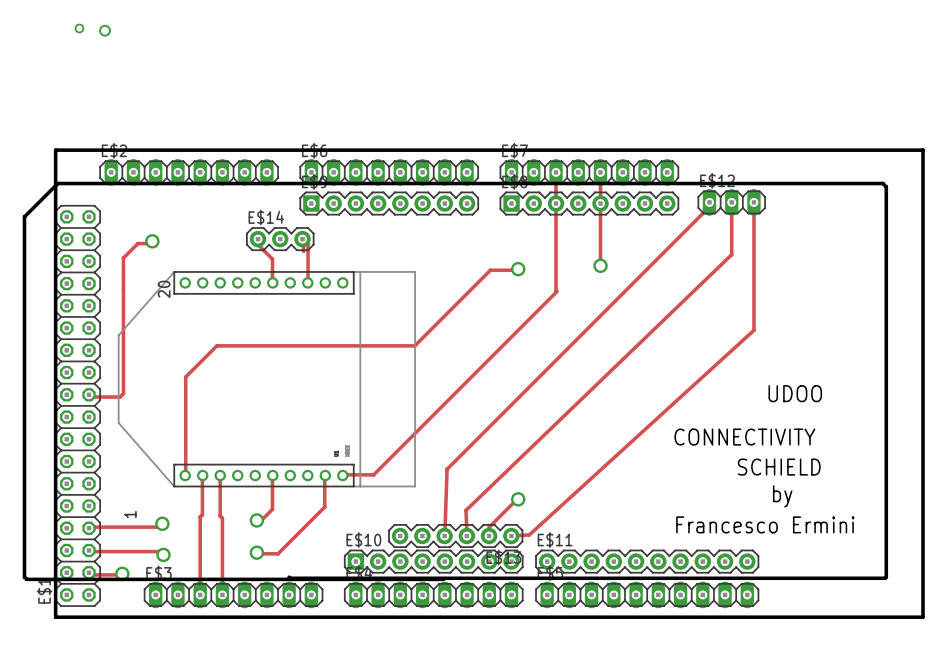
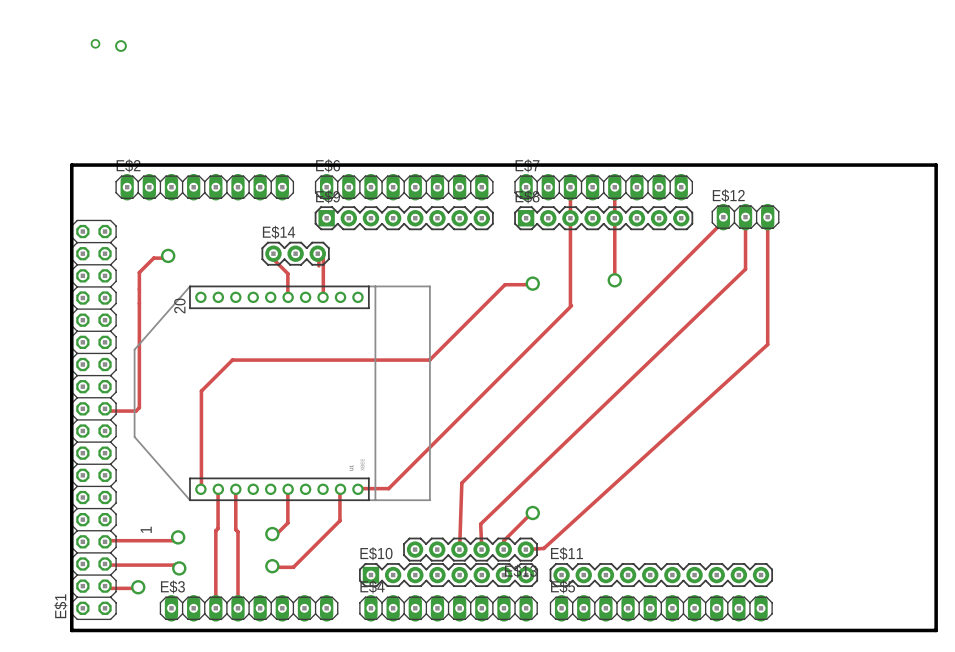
text: UDOO (795, 393) -> none
text: CONNECTIVITY (744, 437) -> none
text: SCHIELD (779, 467) -> none
text: by (782, 496) -> none
text: Francesco Ermini (765, 524) -> none
board edge: (289, 577) (885, 578) (886, 186) (882, 183) (57, 183) (24, 216) (24, 577) (26, 579) (443, 579) -> none

